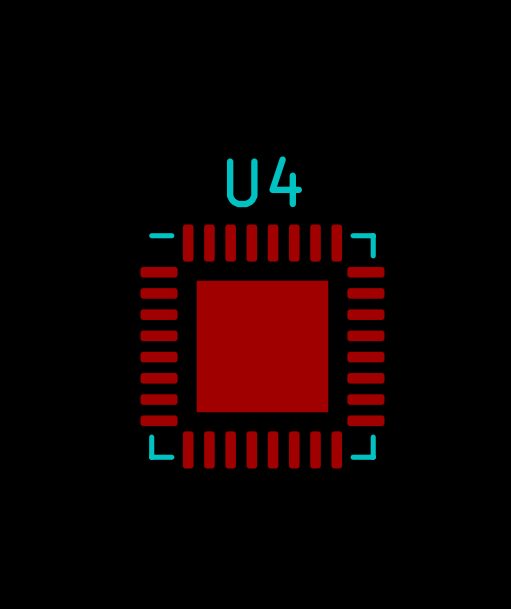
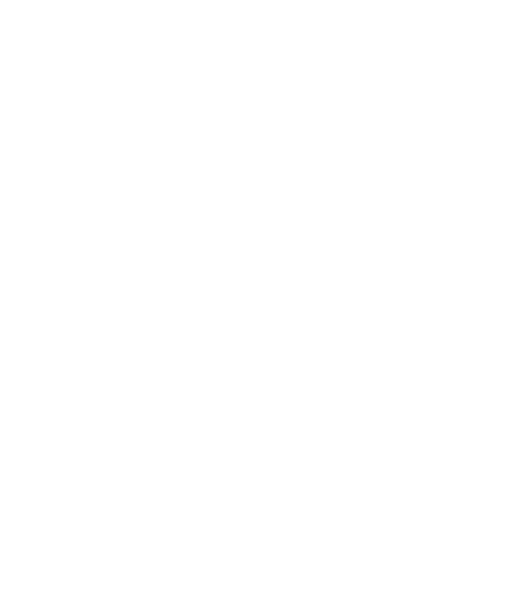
U4: (262, 346) -> none

